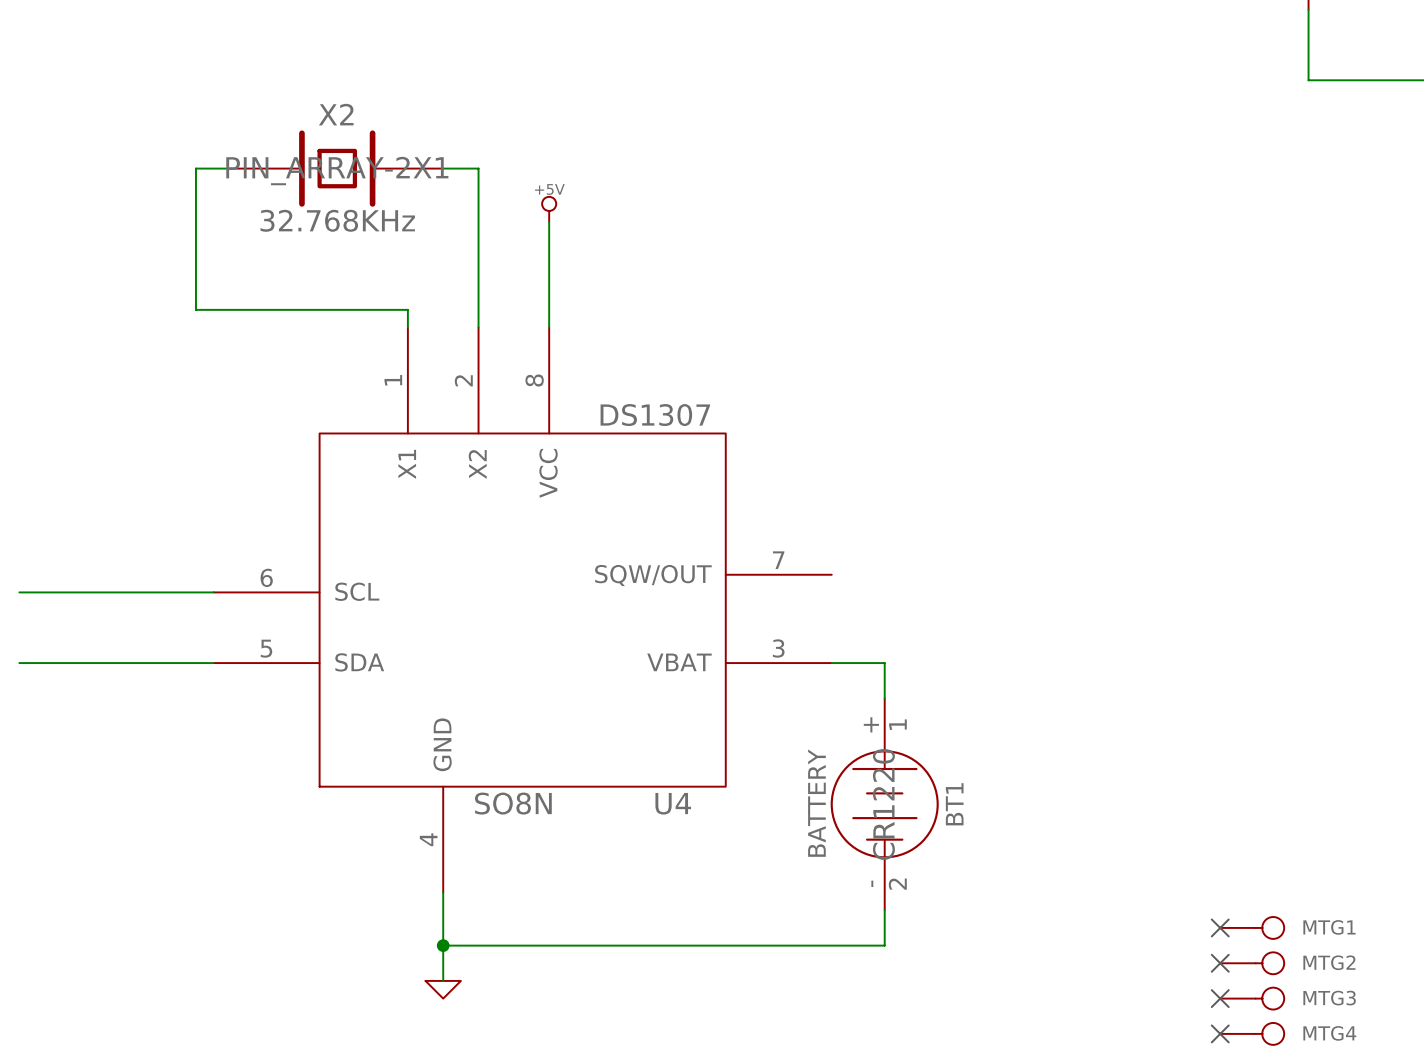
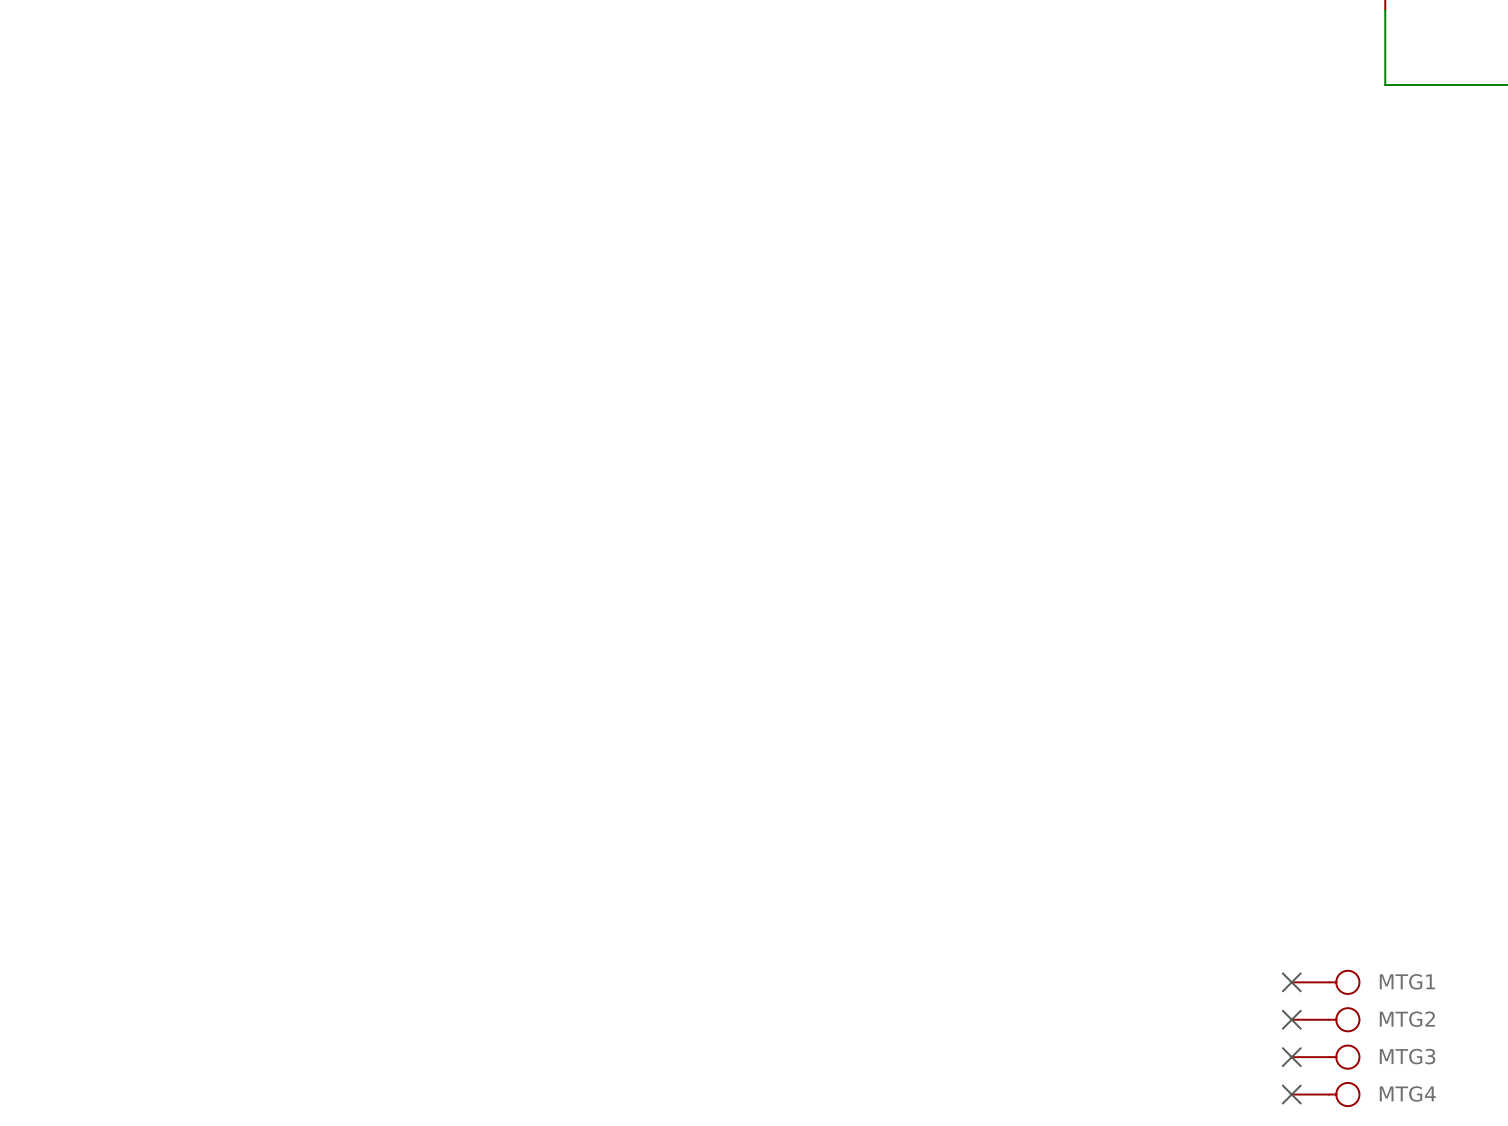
wire: (231, 168) (195, 168) (195, 309) (407, 309) (407, 327) -> none
X2: 32.768KHz (337, 168) -> none
wire: (443, 168) (478, 168) (478, 327) -> none
power symbol: +5V (549, 209) -> none
wire: (549, 221) (549, 327) -> none
wire: (19, 592) (213, 592) -> none
U4: DS1307 (522, 610) -> none
wire: (19, 663) (213, 663) -> none
wire: (831, 663) (884, 663) (884, 698) -> none
BT1: BATTERY (884, 804) -> none
wire: (443, 892) (443, 980) -> none
wire: (884, 910) (884, 945) (443, 945) -> none
junction: (443, 945) -> none
power symbol: (443, 989) -> none

